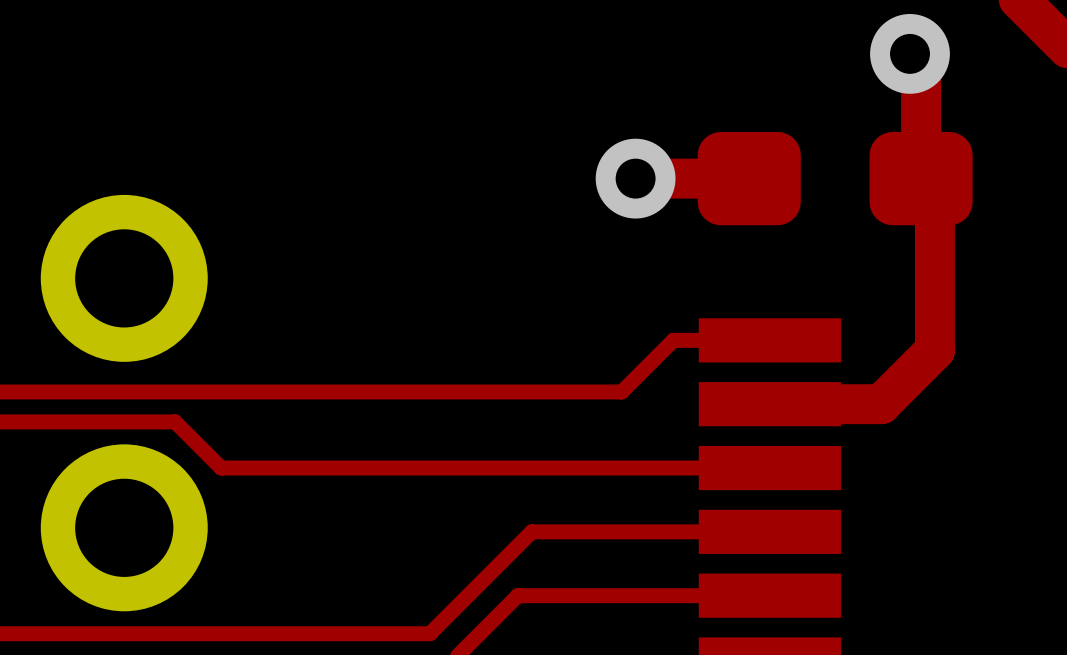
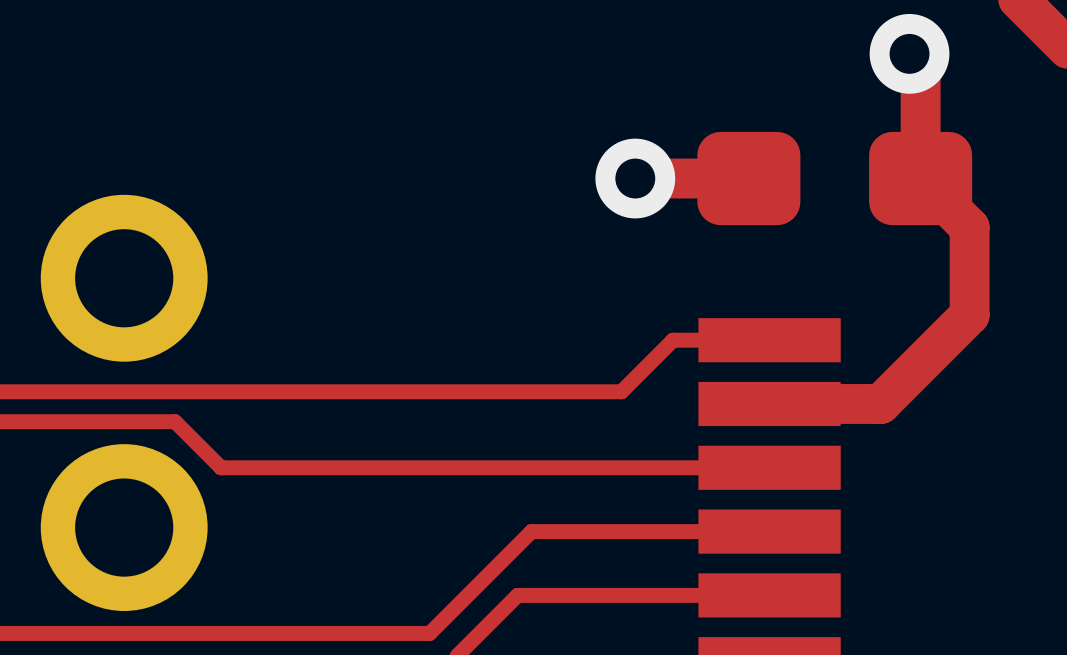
top track: (934, 192) (934, 350) -> (934, 192) (969, 227) (969, 315) (934, 350)

